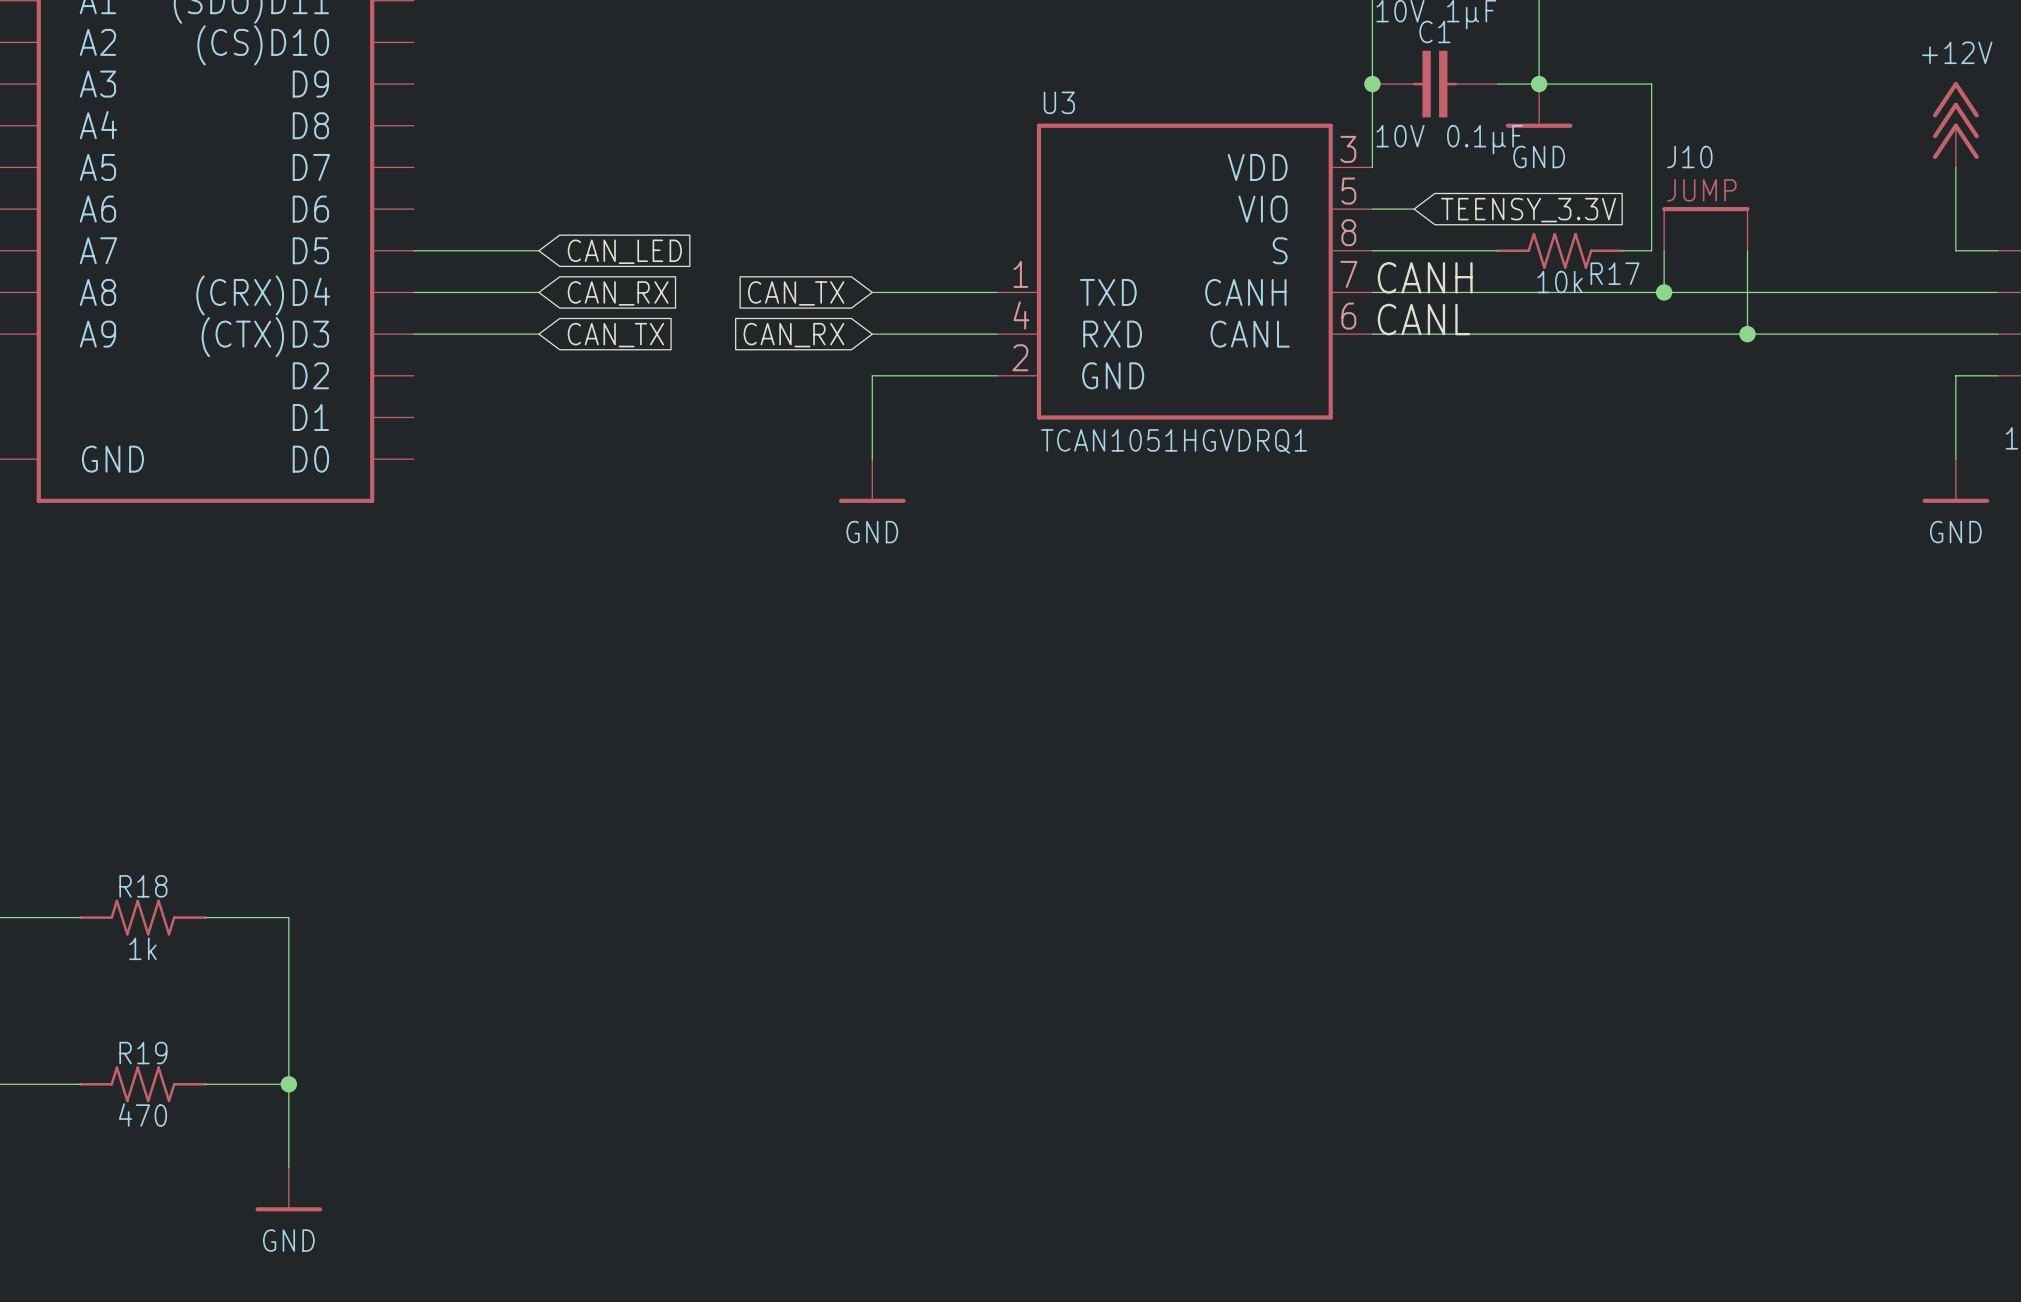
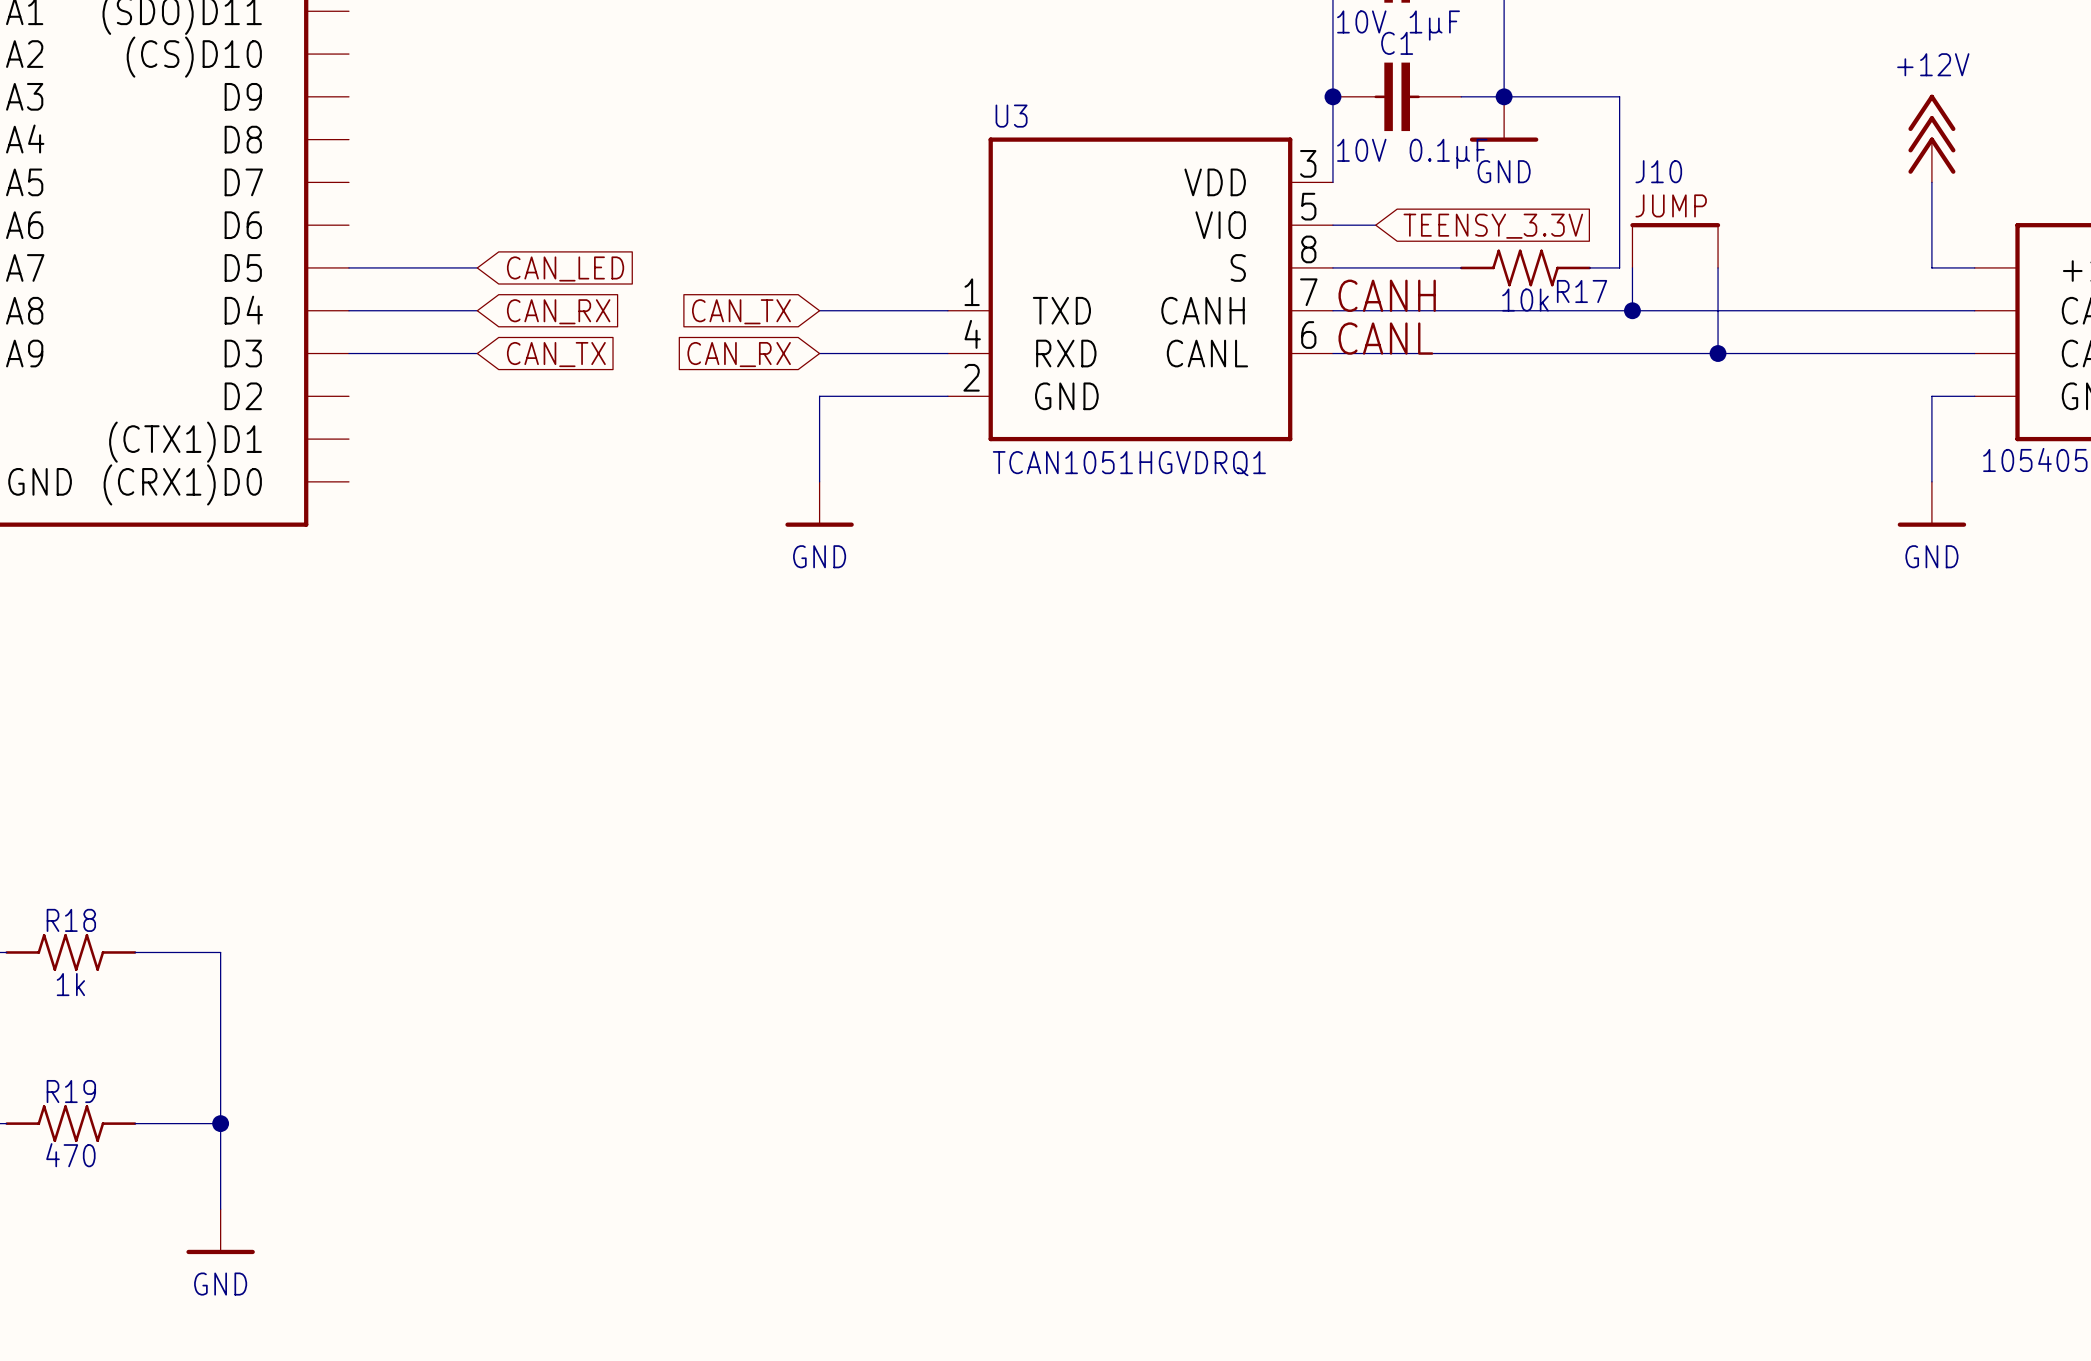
part pin name: (CRX)D4 (263, 295) -> D4 (243, 310)
part pin name: (CTX)D3 (265, 337) -> D3 (243, 353)
part pin name: D1 (310, 417) -> (CTX1)D1 (185, 442)
part pin name: D0 (310, 459) -> (CRX1)D0 (182, 484)

